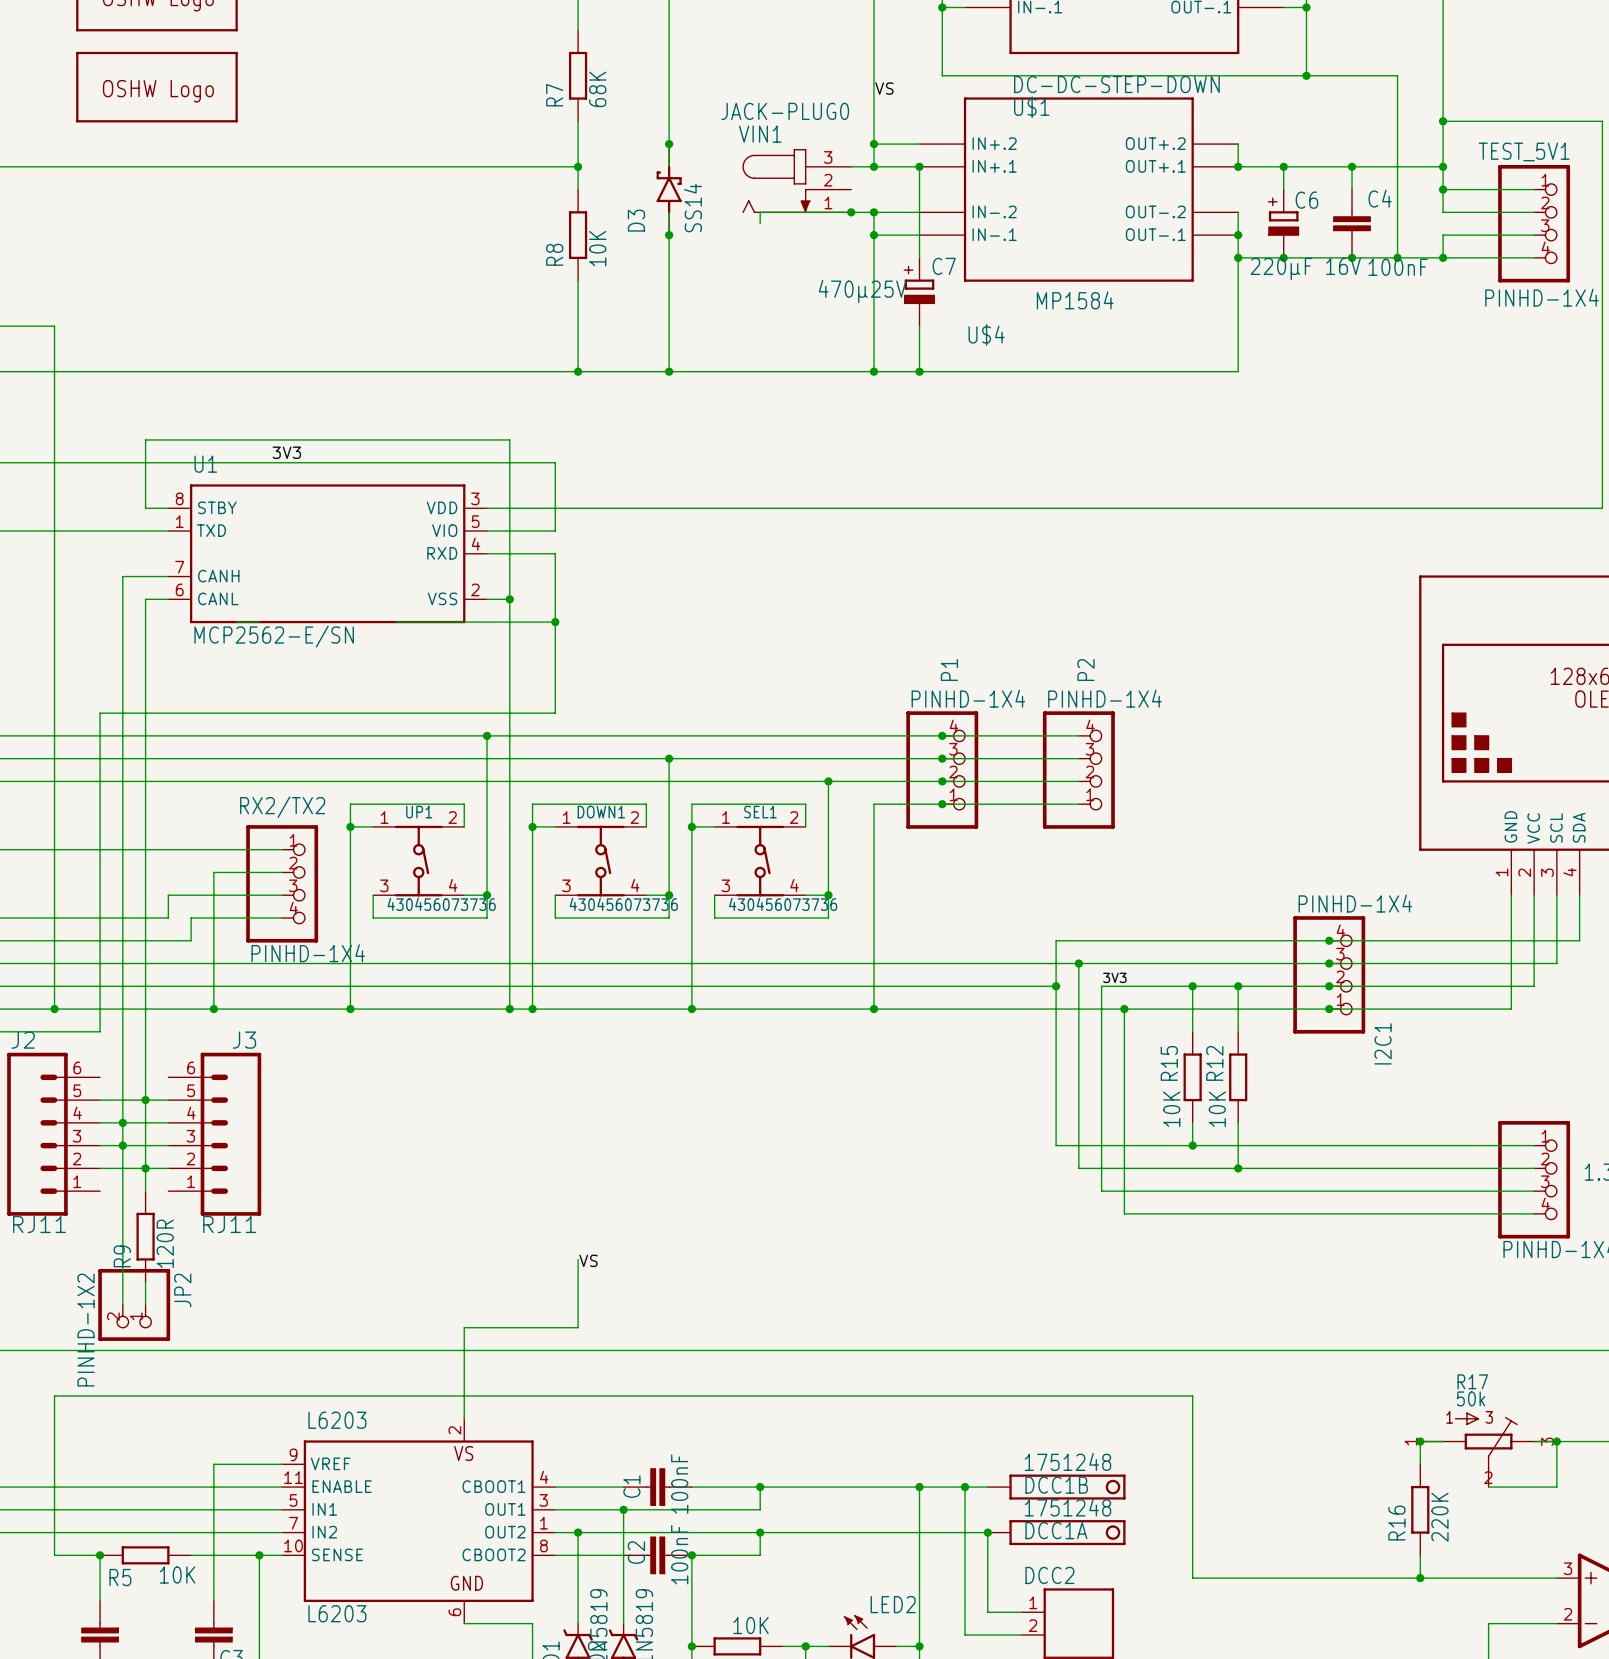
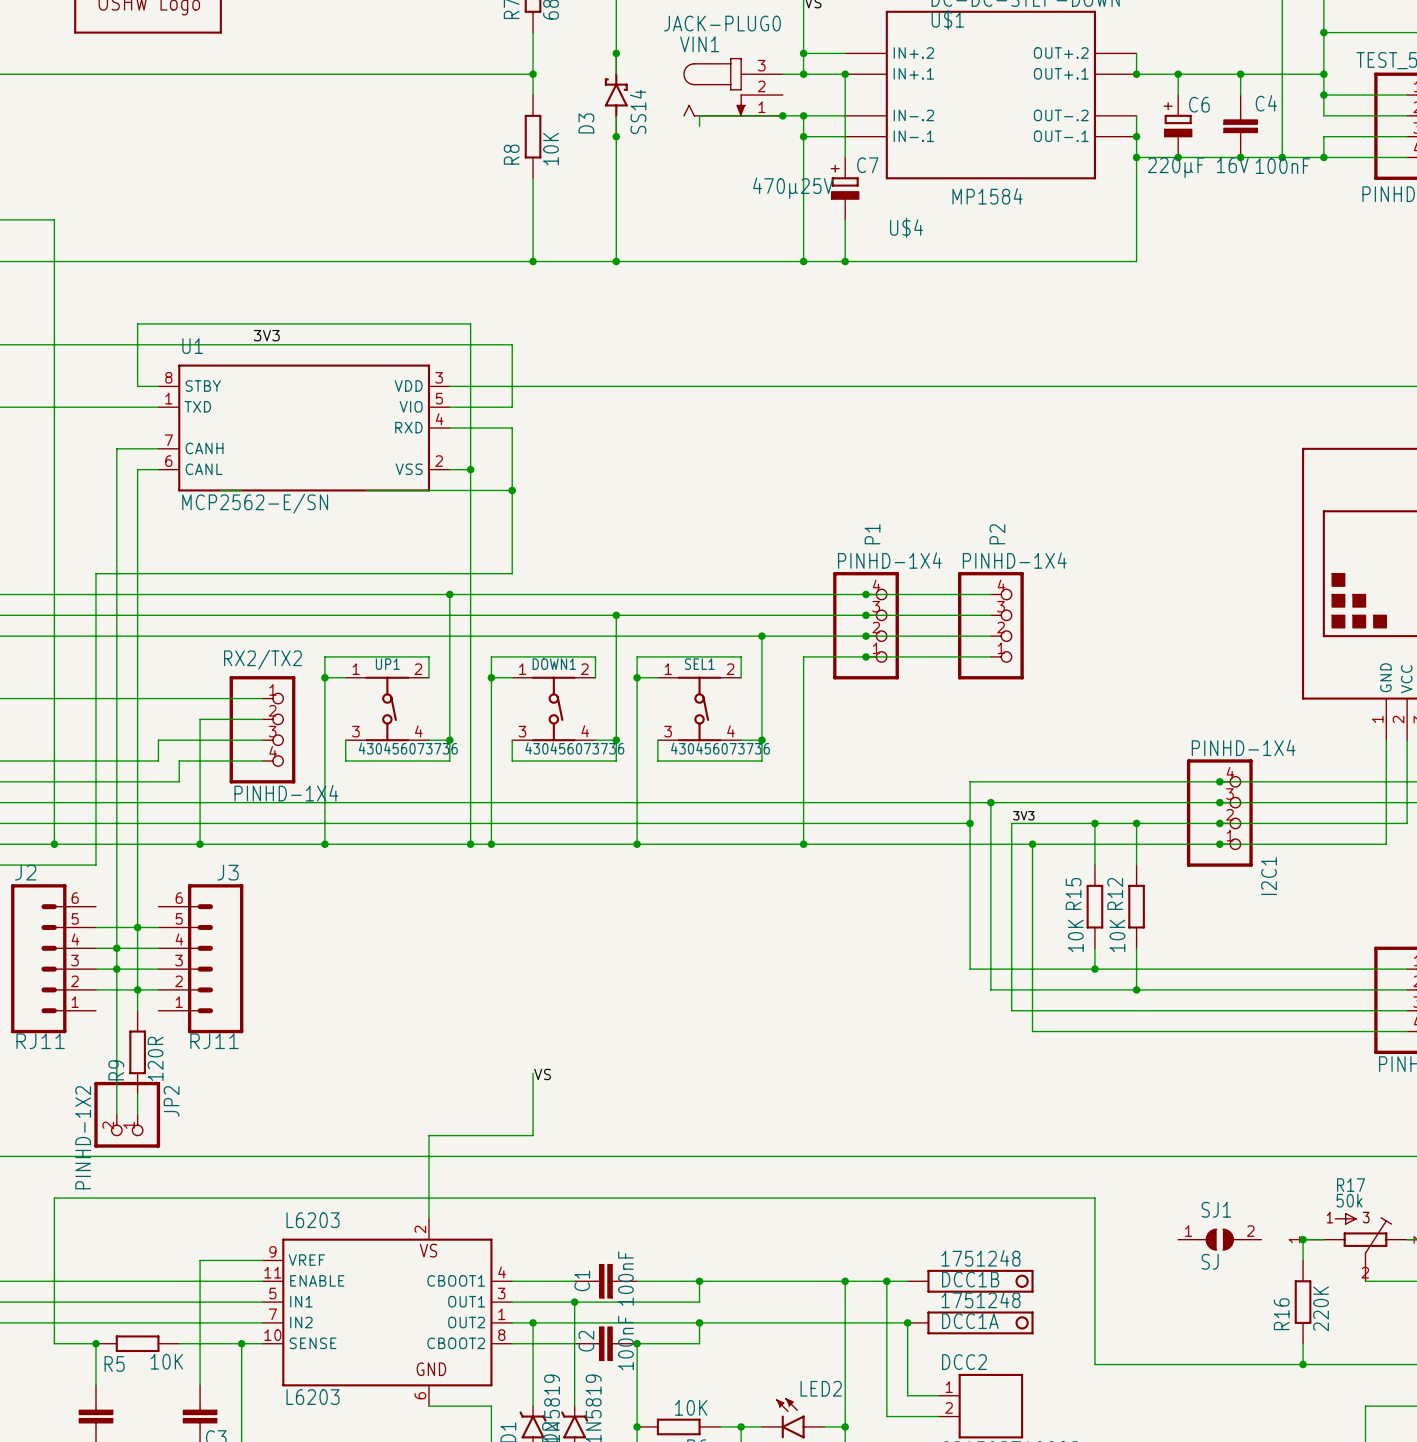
SJ1: none -> SJ (1219, 1239)

